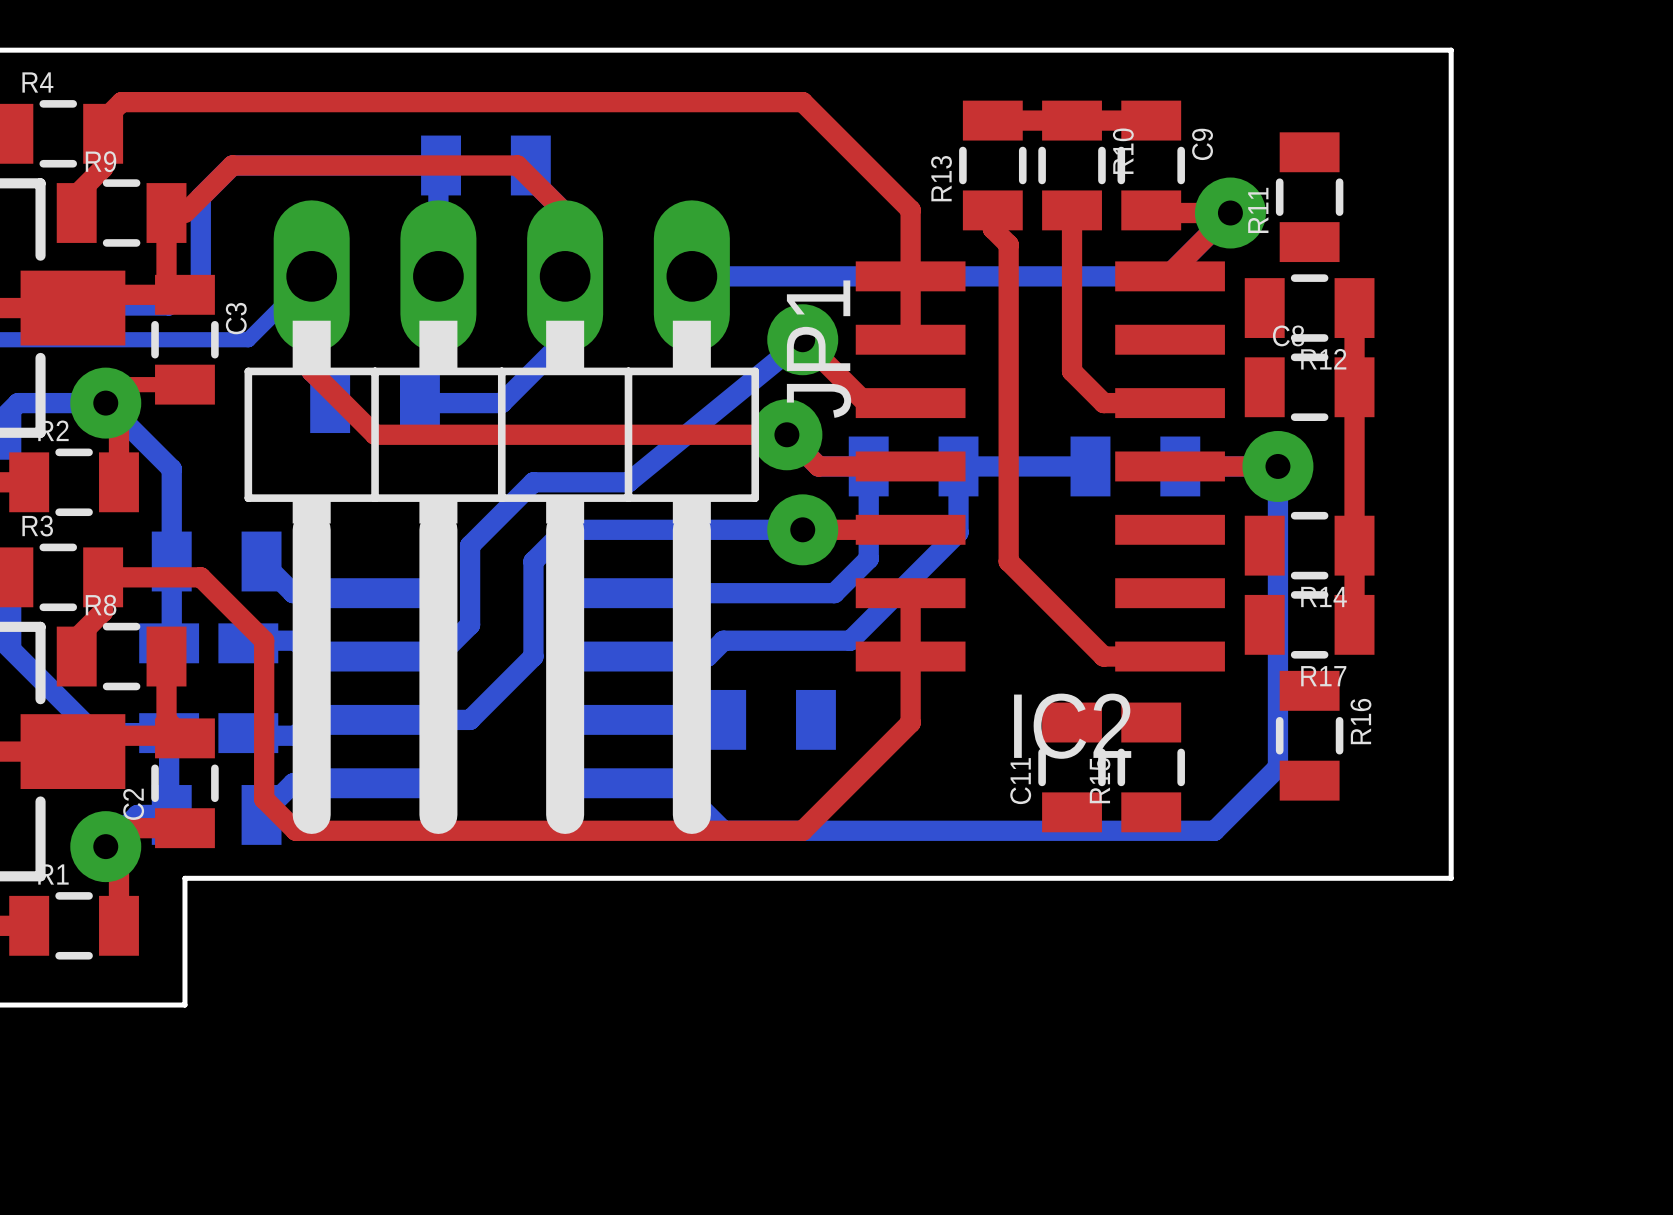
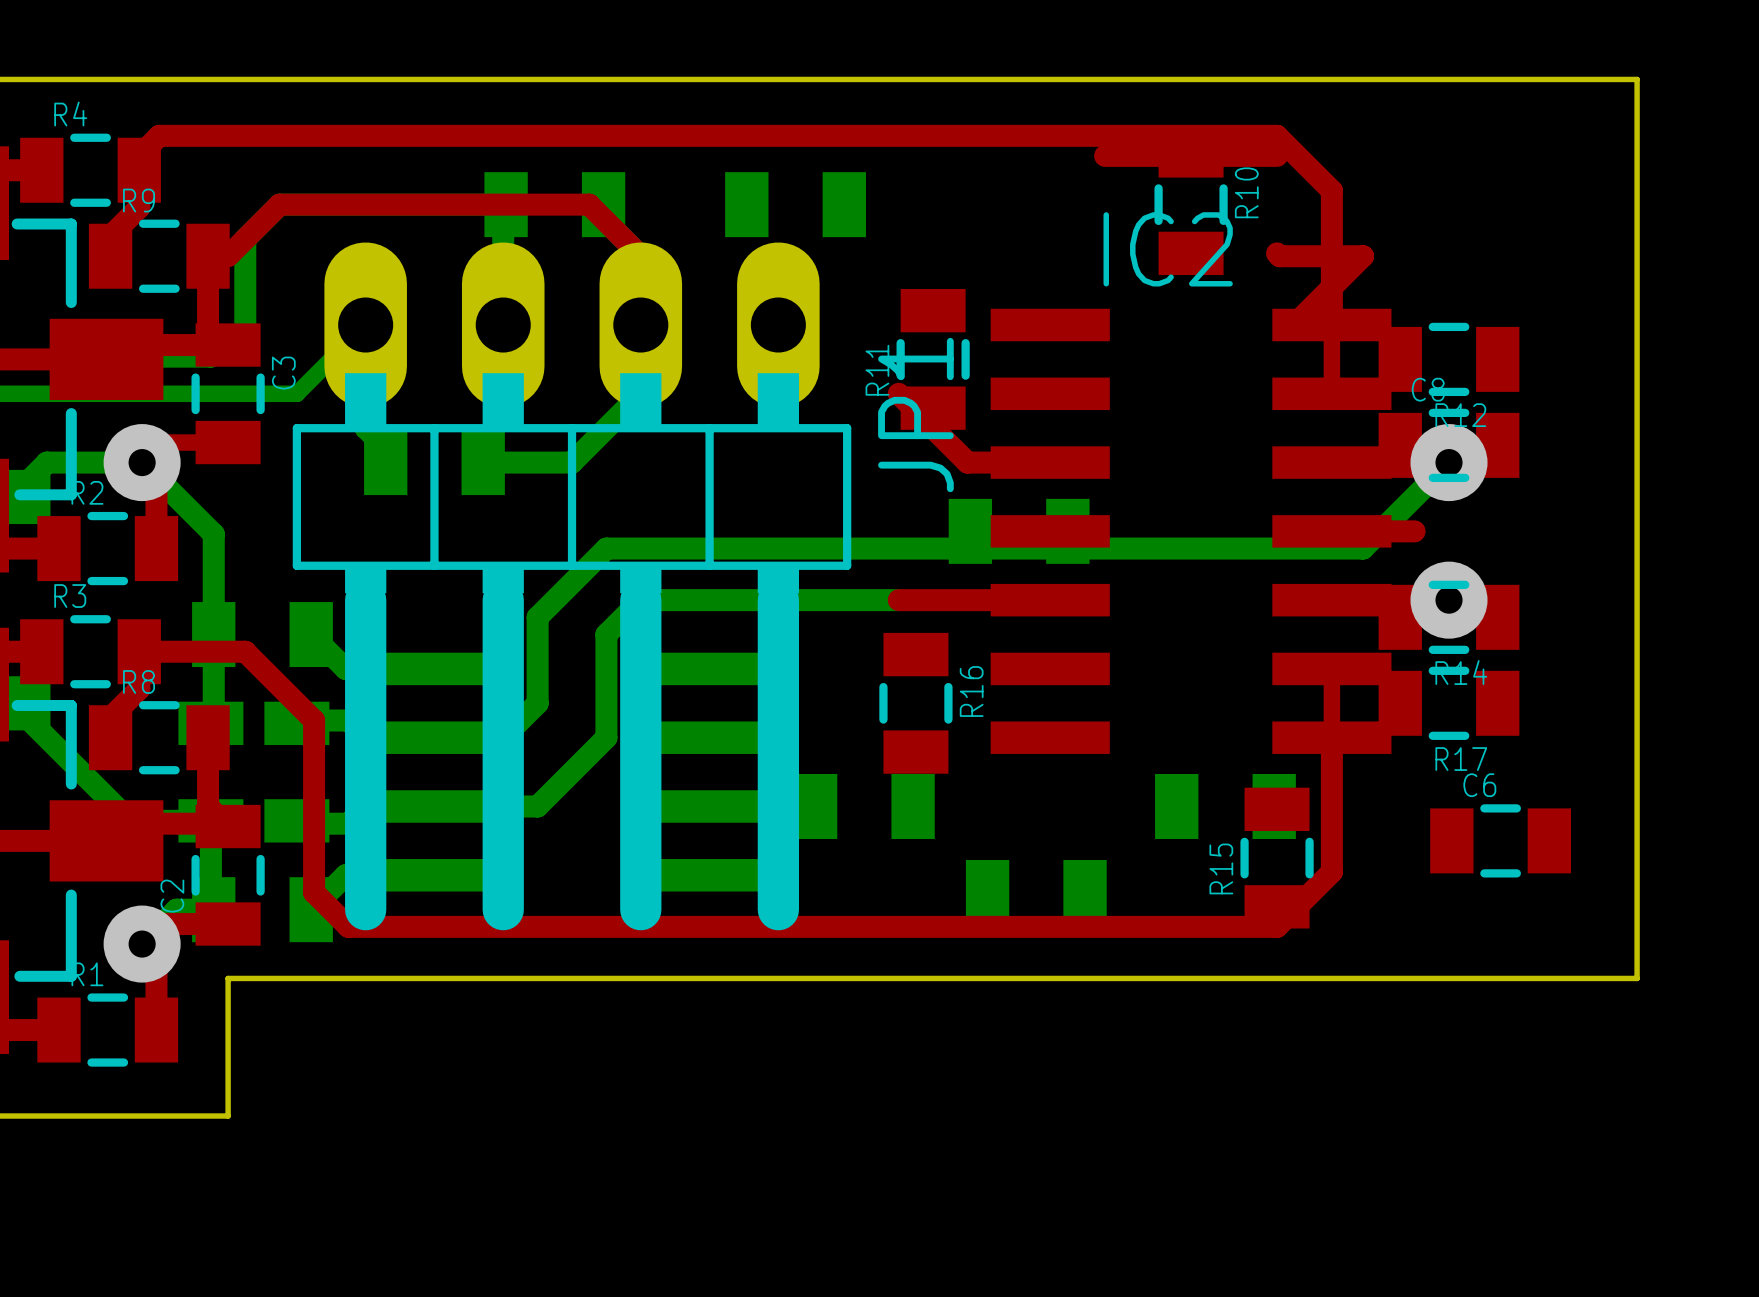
board edge: (1451, 50) (1451, 878) -> (1602, 79) (1637, 79) (1637, 978) (1602, 978)
top track: (802, 102) (910, 210) (910, 339) -> (898, 135) (1277, 135) (1331, 190) (1331, 393)
R13 side: top (992, 165) -> bottom (1225, 806)
C9 side: top (1151, 165) -> bottom (795, 204)
R11 position: (1309, 197) -> (933, 359)
top track: (992, 210) (992, 228) (1008, 244) (1008, 561) (1103, 656) (1170, 656) -> none
top track: (1072, 210) (1072, 371) (1103, 403) (1170, 403) -> none
bottom track: (1230, 213) (1167, 276) (691, 276) -> none
via: (1230, 213) -> none
top track: (311, 276) (311, 371) (375, 434) (786, 434) (818, 466) (910, 466) -> none
top track: (1354, 308) (1354, 624) -> none
bottom track: (802, 339) (628, 482) -> (1449, 462) (1363, 548) (709, 548)
via: (802, 339) -> none
via: none -> (1449, 462)
bottom track: (786, 434) (818, 466) (868, 466) (868, 558) (834, 593) (631, 593) -> none
via: (786, 434) -> none
IC2 position: (1040, 466) -> (1191, 531)
bottom track: (1090, 466) (958, 466) (958, 532) (850, 640) (723, 640) (707, 656) (631, 656) -> none
C6 side: bottom (1135, 466) -> top (1500, 840)
bottom track: (1180, 466) (1277, 466) (1277, 767) (1214, 830) (723, 830) (676, 783) (631, 783) -> none
via: (1277, 466) -> none
via: (802, 529) -> none
via: none -> (1449, 600)
top track: (910, 593) (910, 722) (802, 830) -> (1331, 668) (1331, 872) (1277, 926) (898, 926)
IC2 name position: IC2 (1072, 726) -> IC2 (1168, 249)
R16 position: (1309, 735) -> (915, 703)
C11 side: top (1072, 767) -> bottom (1036, 892)

